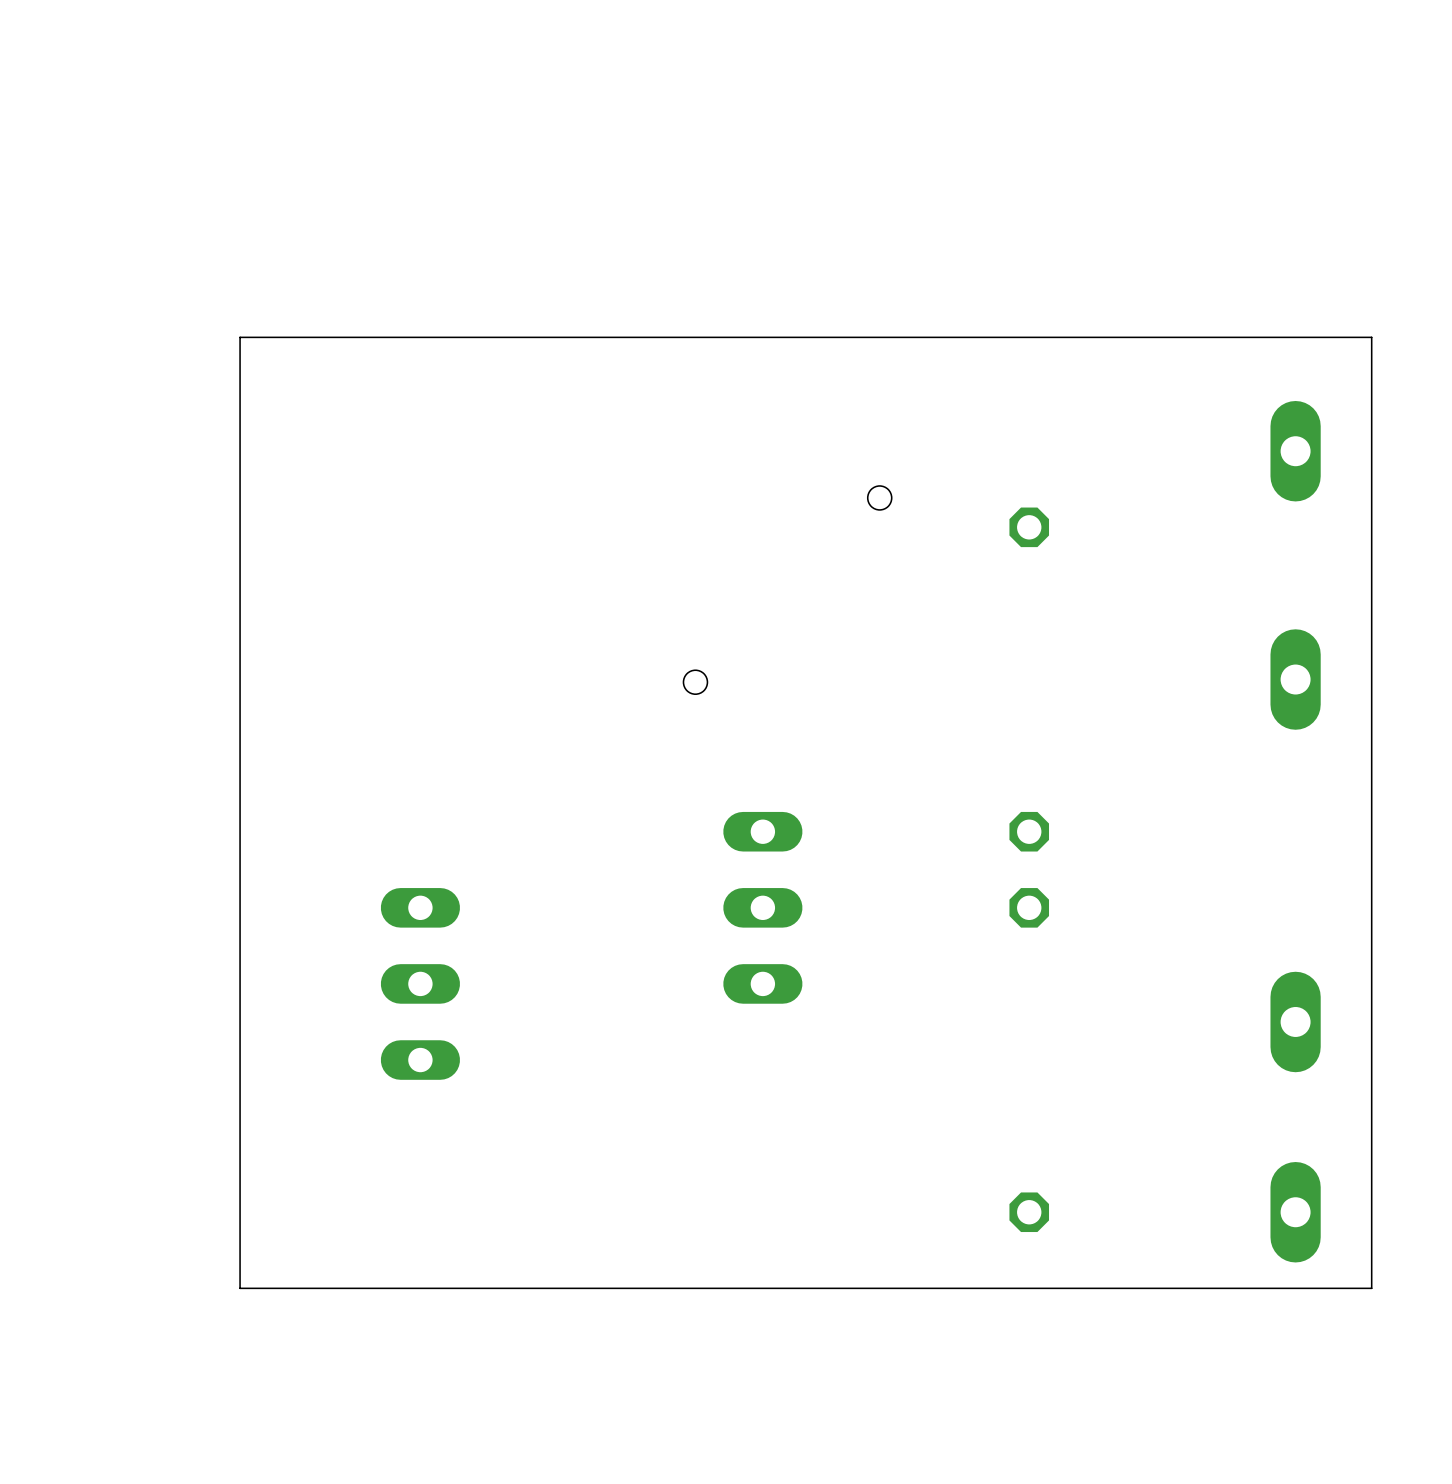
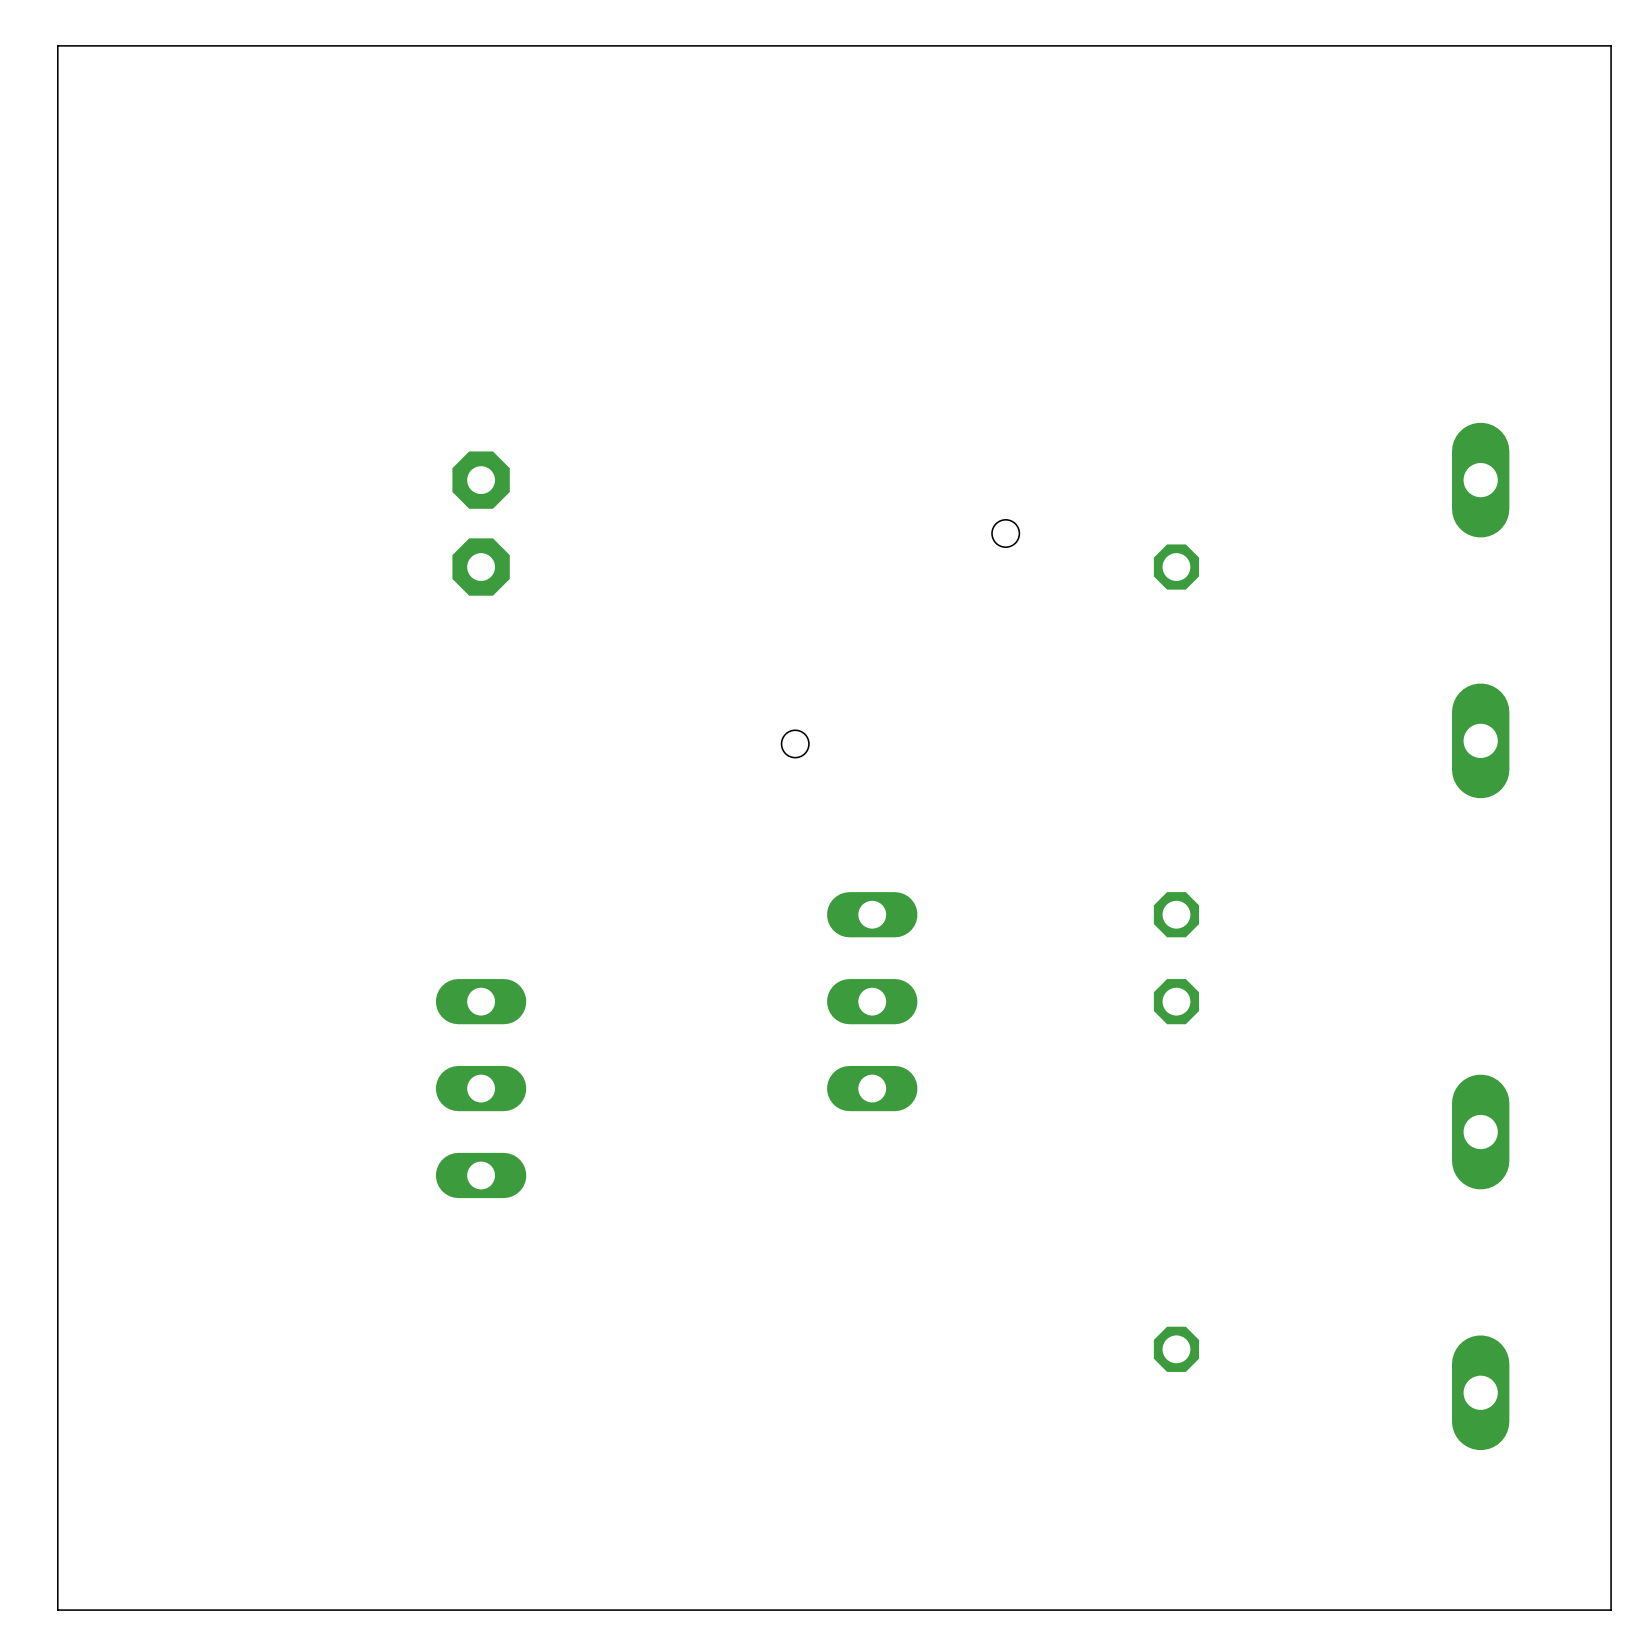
board edge: (1371, 337) (240, 337) (240, 1288) (1371, 1288) (1371, 337) -> (1611, 45) (1611, 1610) (57, 1610) (57, 45) (1611, 45)
part: none -> (481, 523)
part position: (1295, 1212) -> (1480, 1392)

